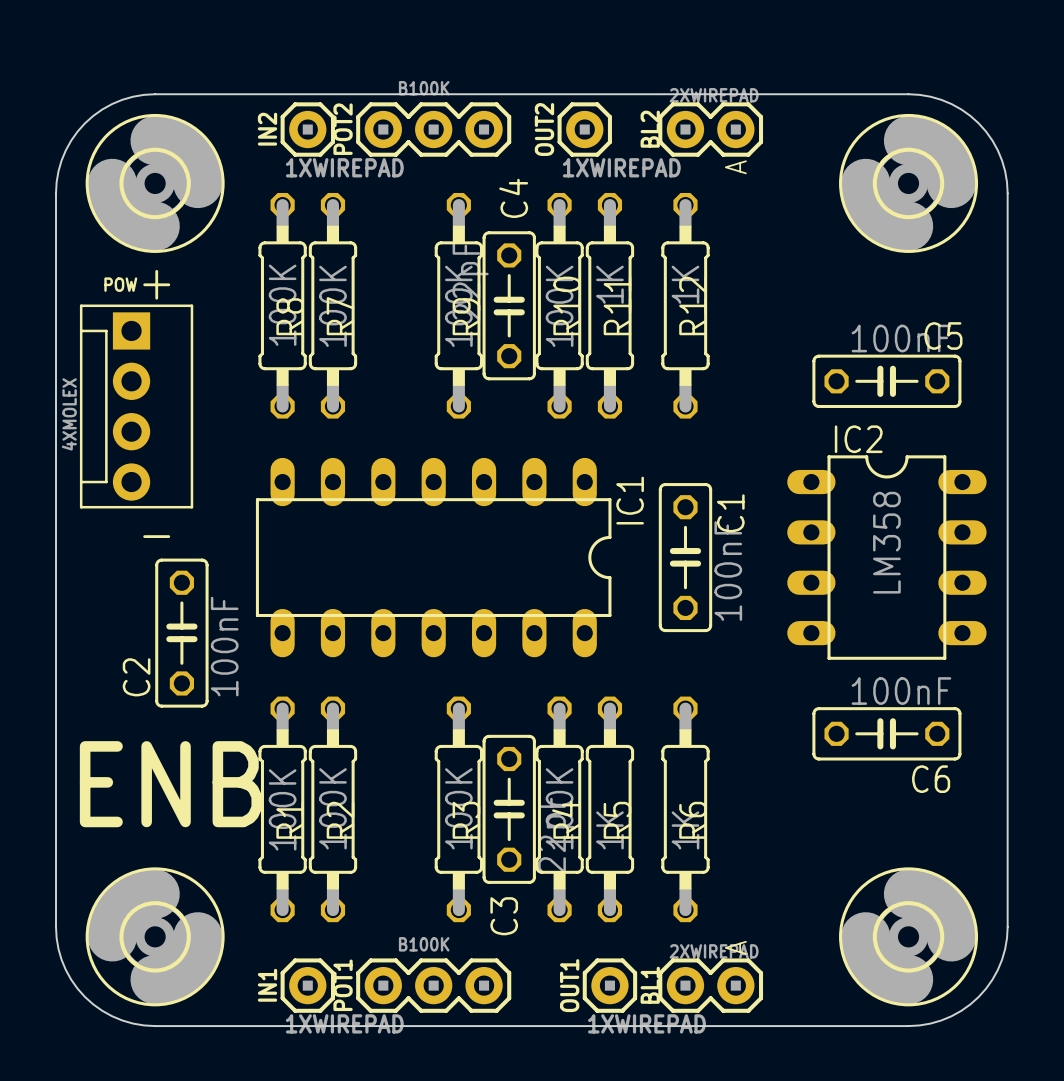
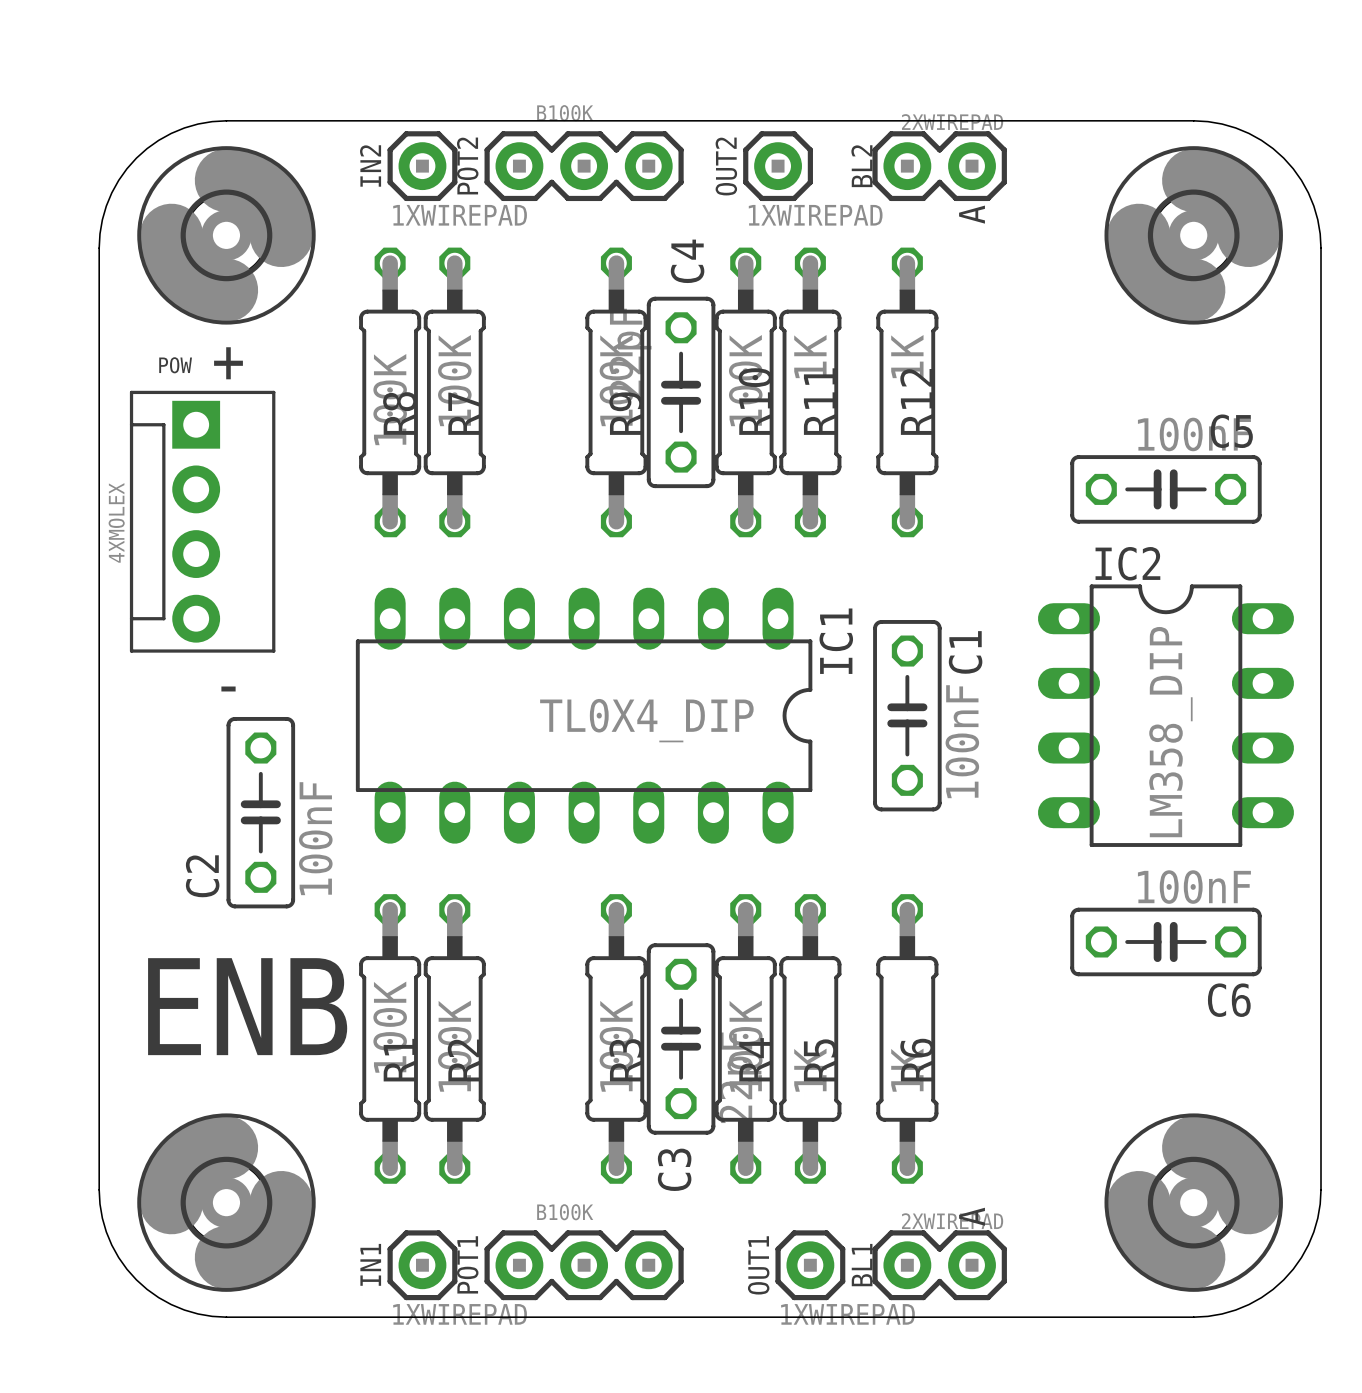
IC2 value: LM358 (886, 542) -> LM358_DIP (1170, 732)
IC1 value: none -> TL0X4_DIP (646, 720)

